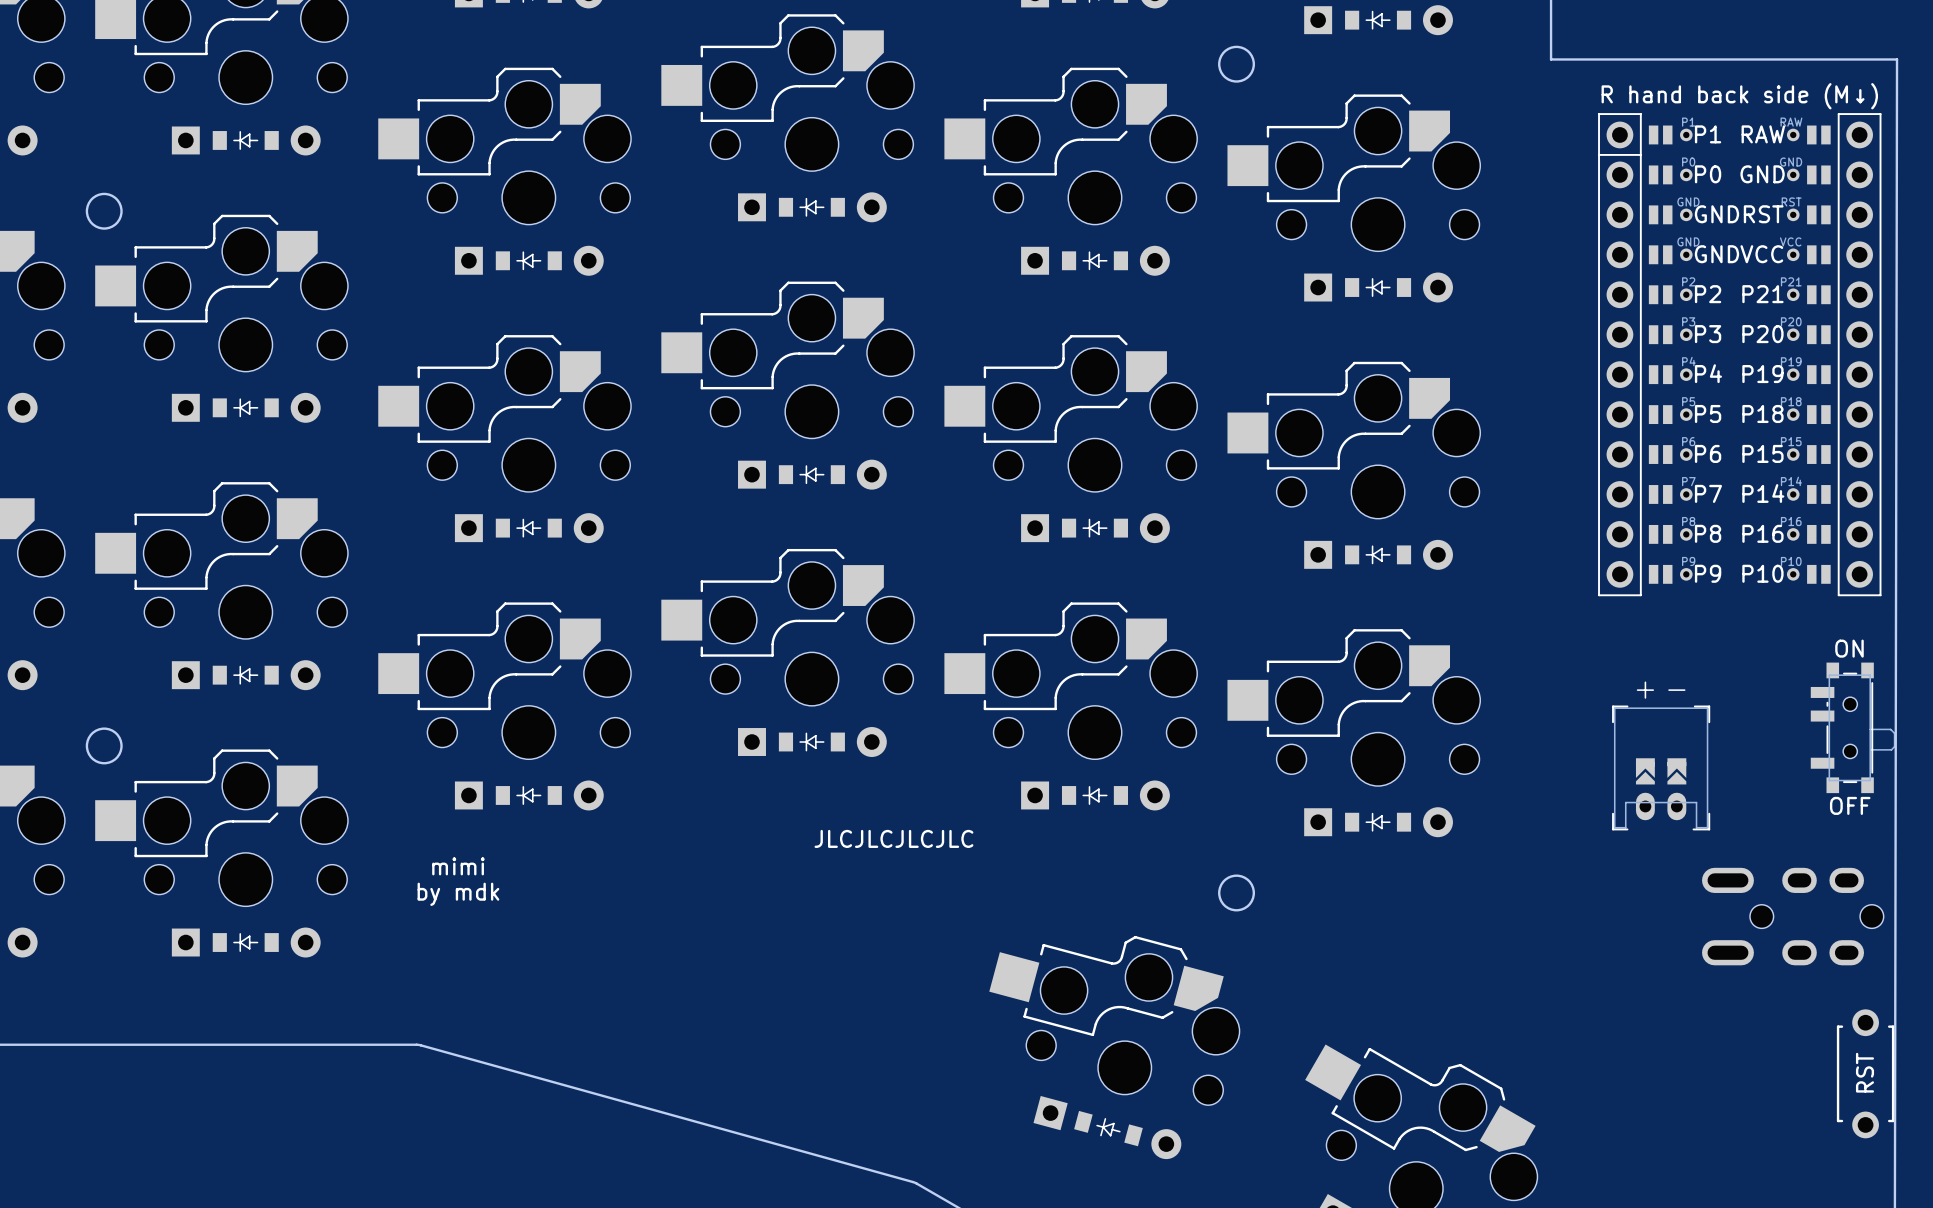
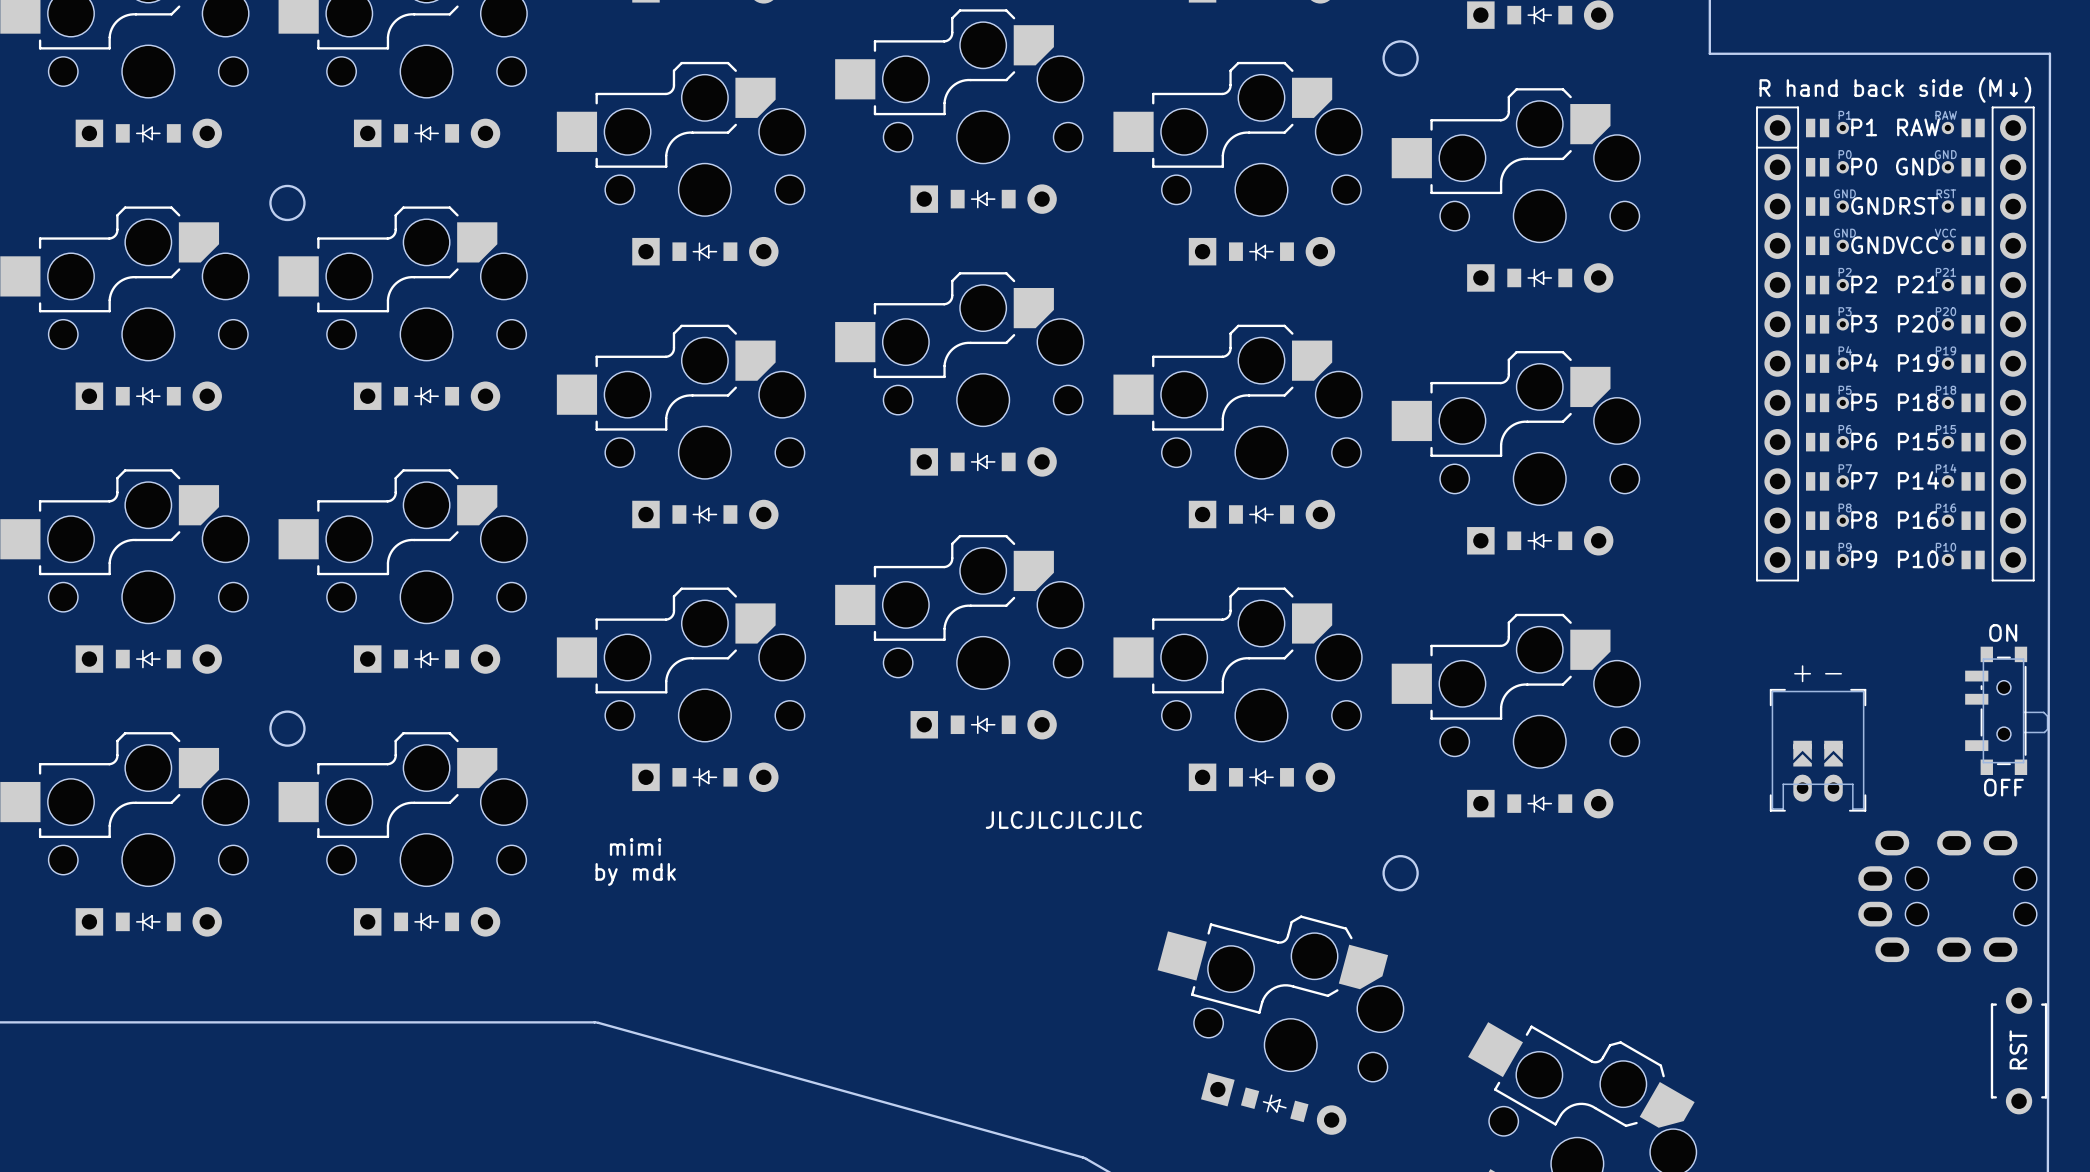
part footprint: [1702, 867, 1884, 966] -> [1858, 830, 2037, 963]

